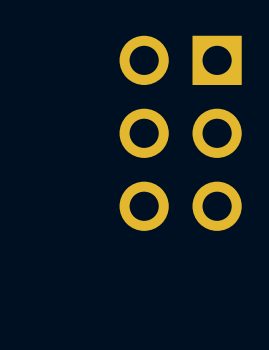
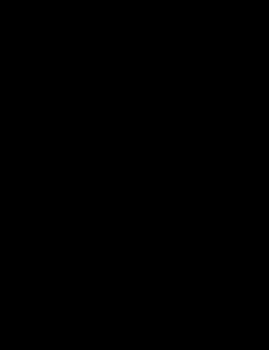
part: (180, 133) -> none

